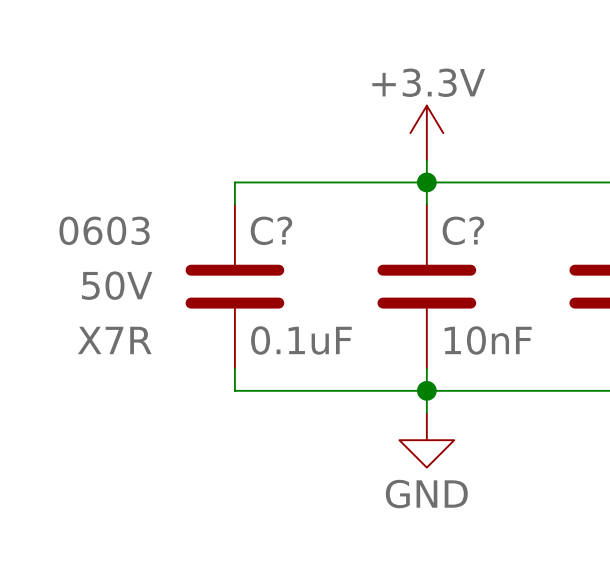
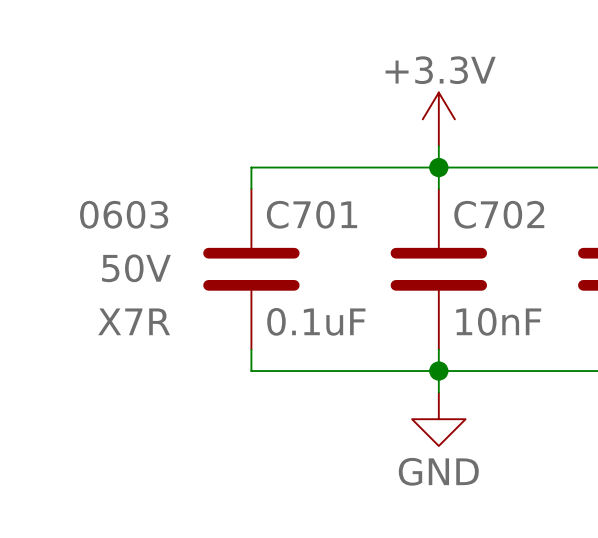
C? name: C? (271, 230) -> C701 (312, 214)
C? name: C? (463, 230) -> C702 (499, 214)

